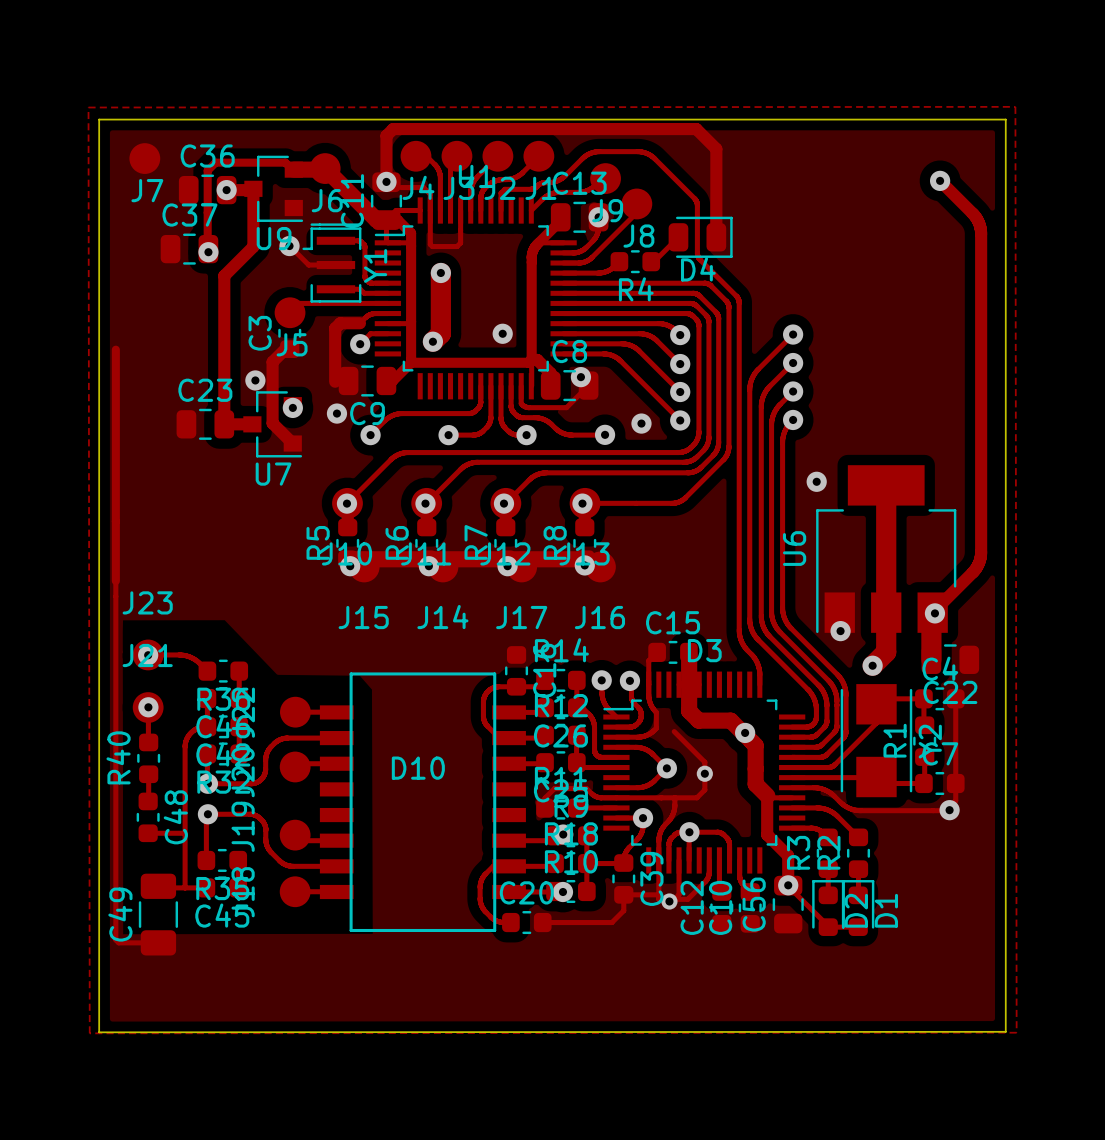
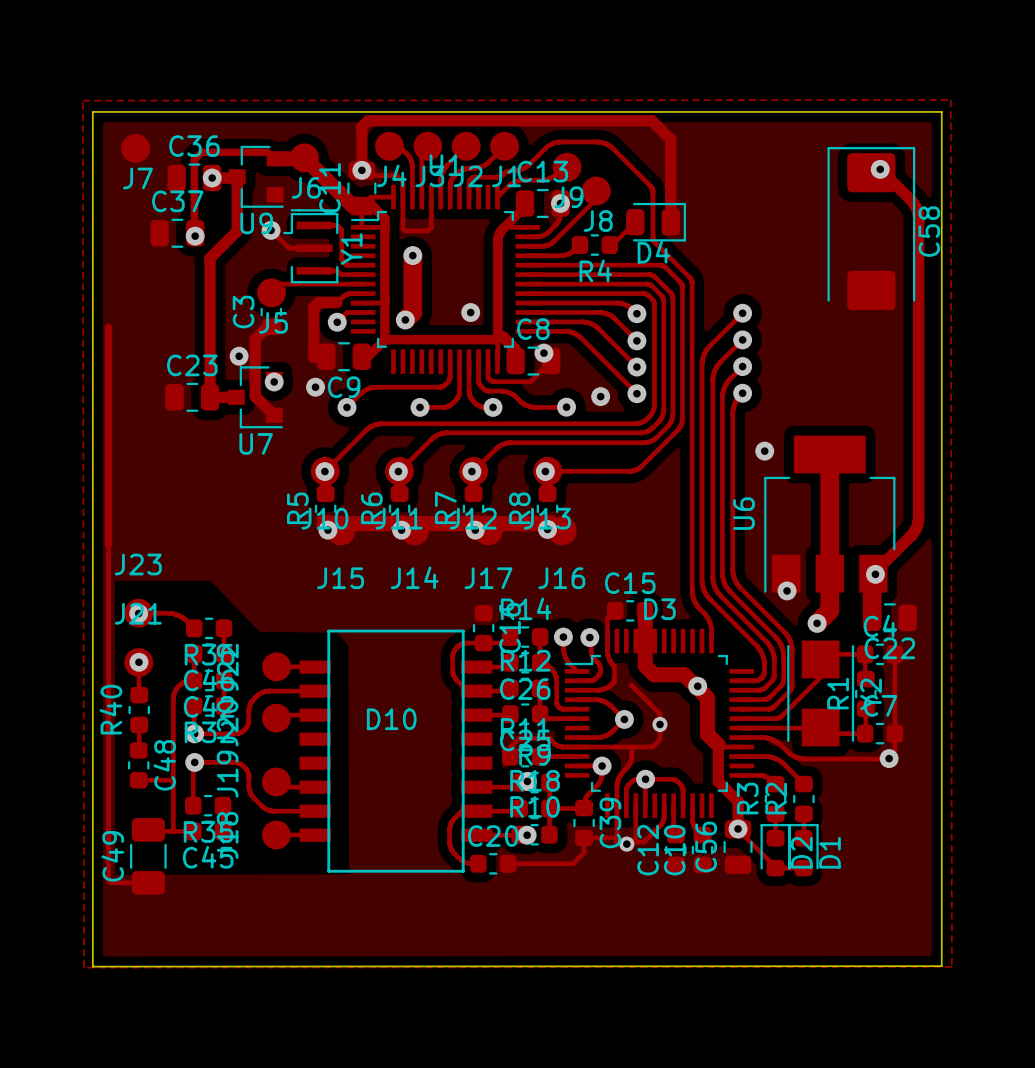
C58: none -> (871, 228)

